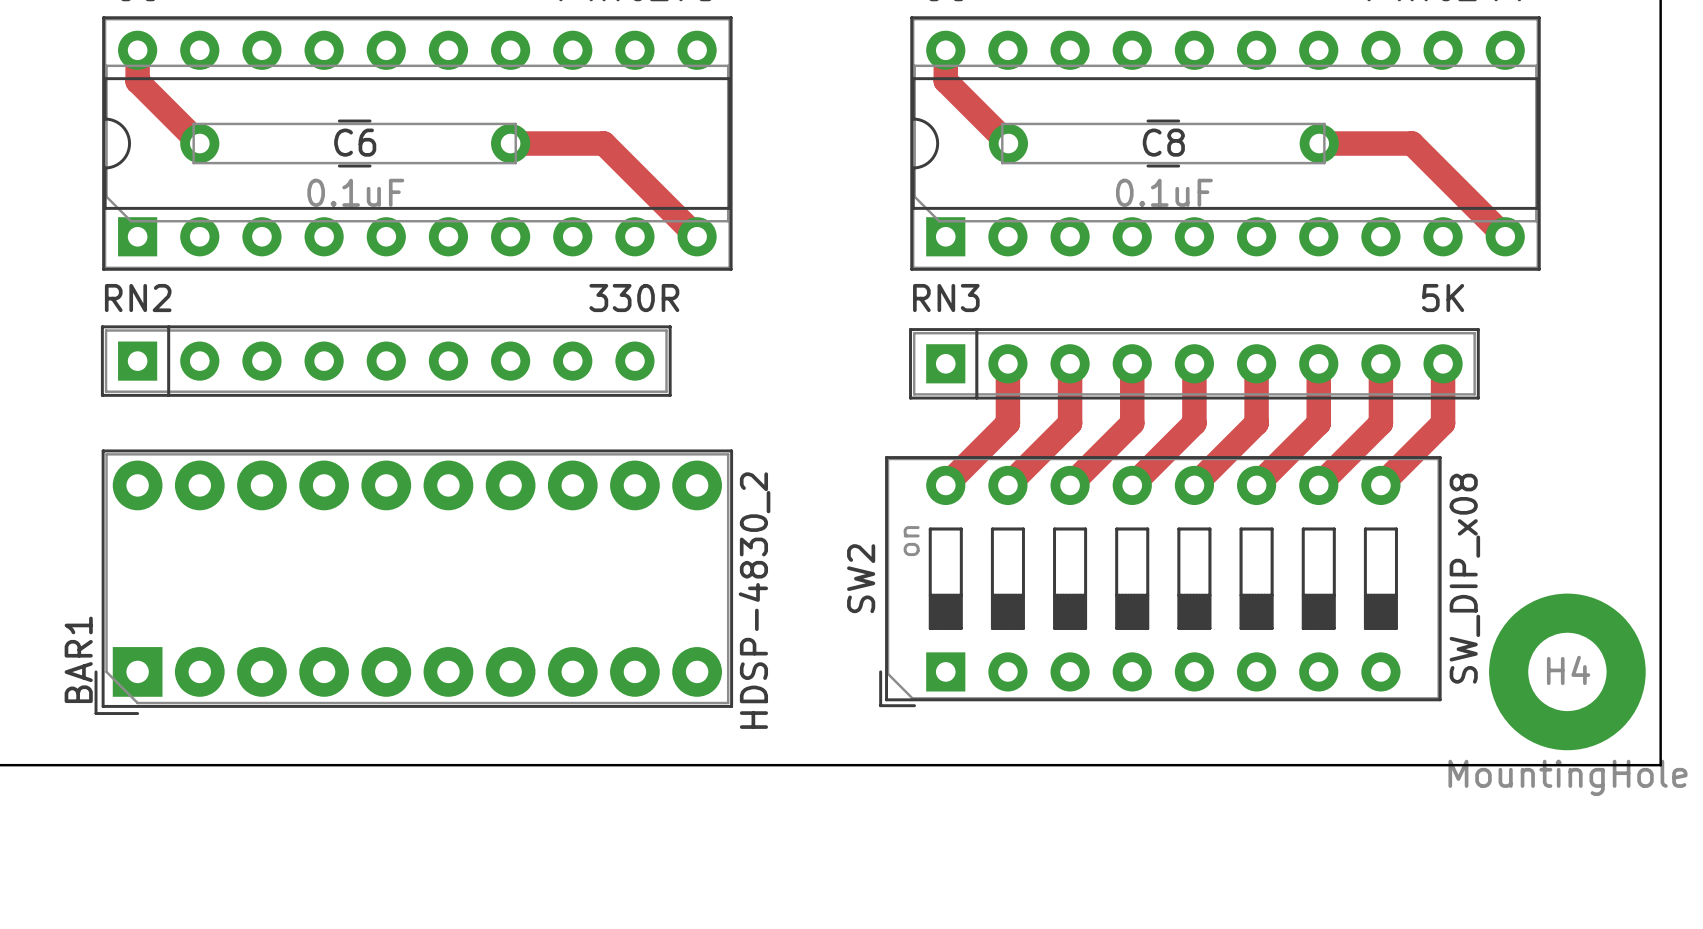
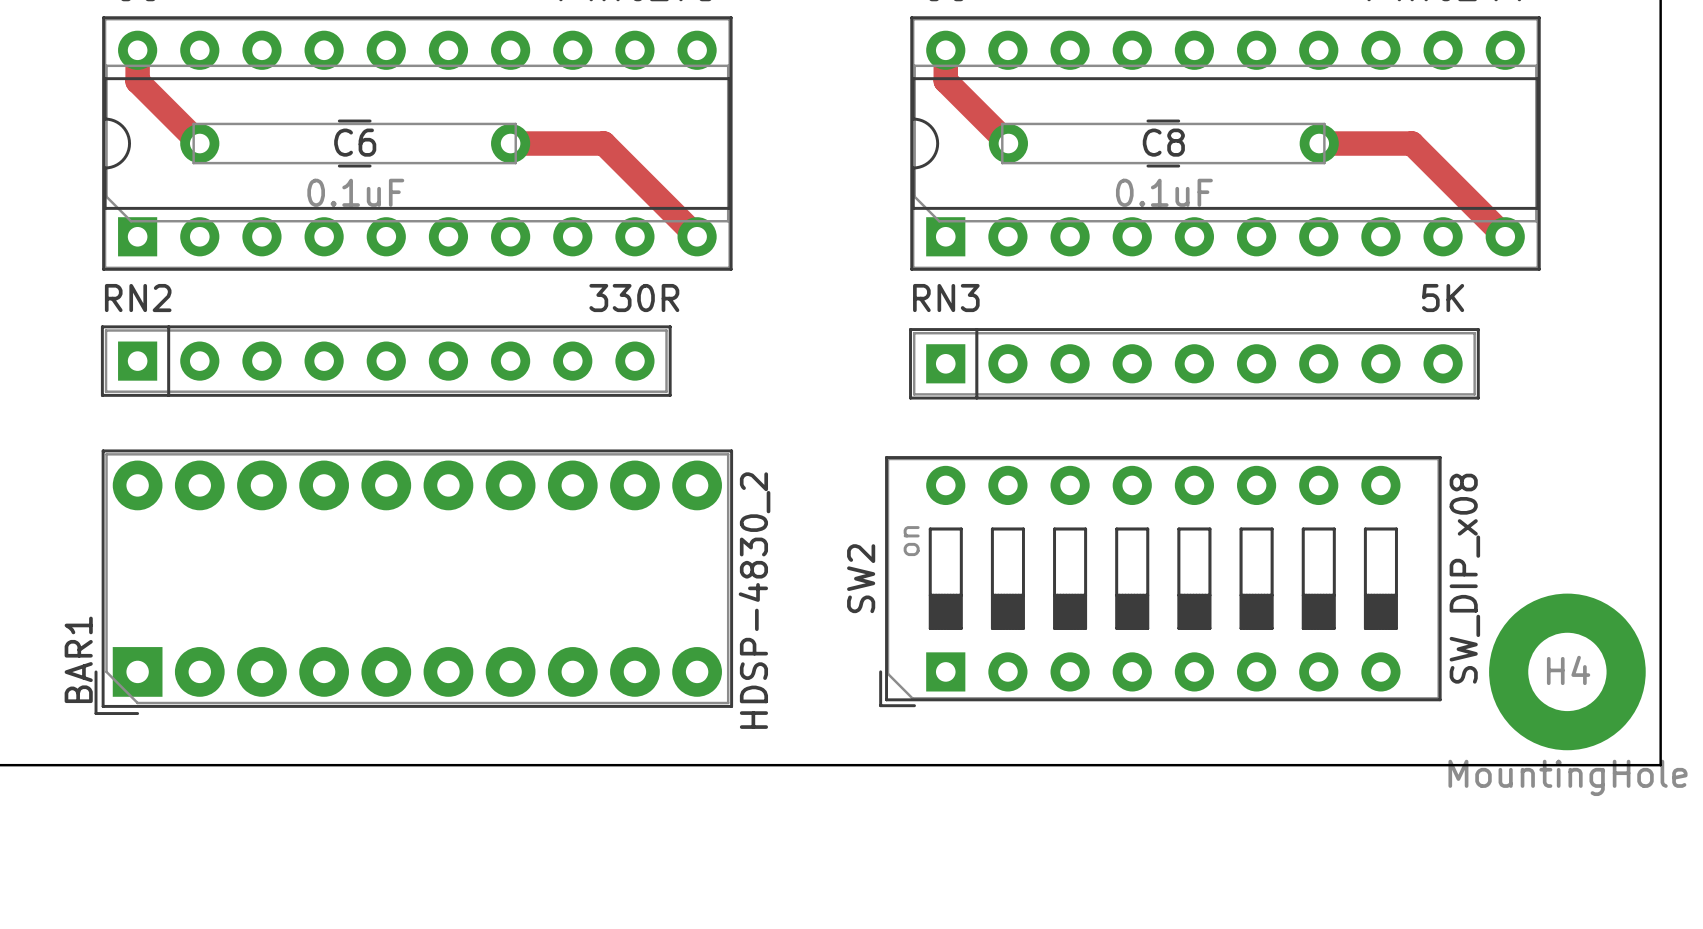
track: (1007, 363) (1007, 423) (945, 485) -> none
track: (1070, 363) (1070, 423) (1007, 485) -> none
track: (1132, 363) (1132, 423) (1070, 485) -> none
track: (1194, 363) (1194, 423) (1132, 485) -> none
track: (1256, 363) (1256, 423) (1194, 485) -> none
track: (1318, 363) (1318, 423) (1256, 485) -> none
track: (1380, 363) (1380, 423) (1318, 485) -> none
track: (1443, 363) (1443, 423) (1380, 485) -> none

